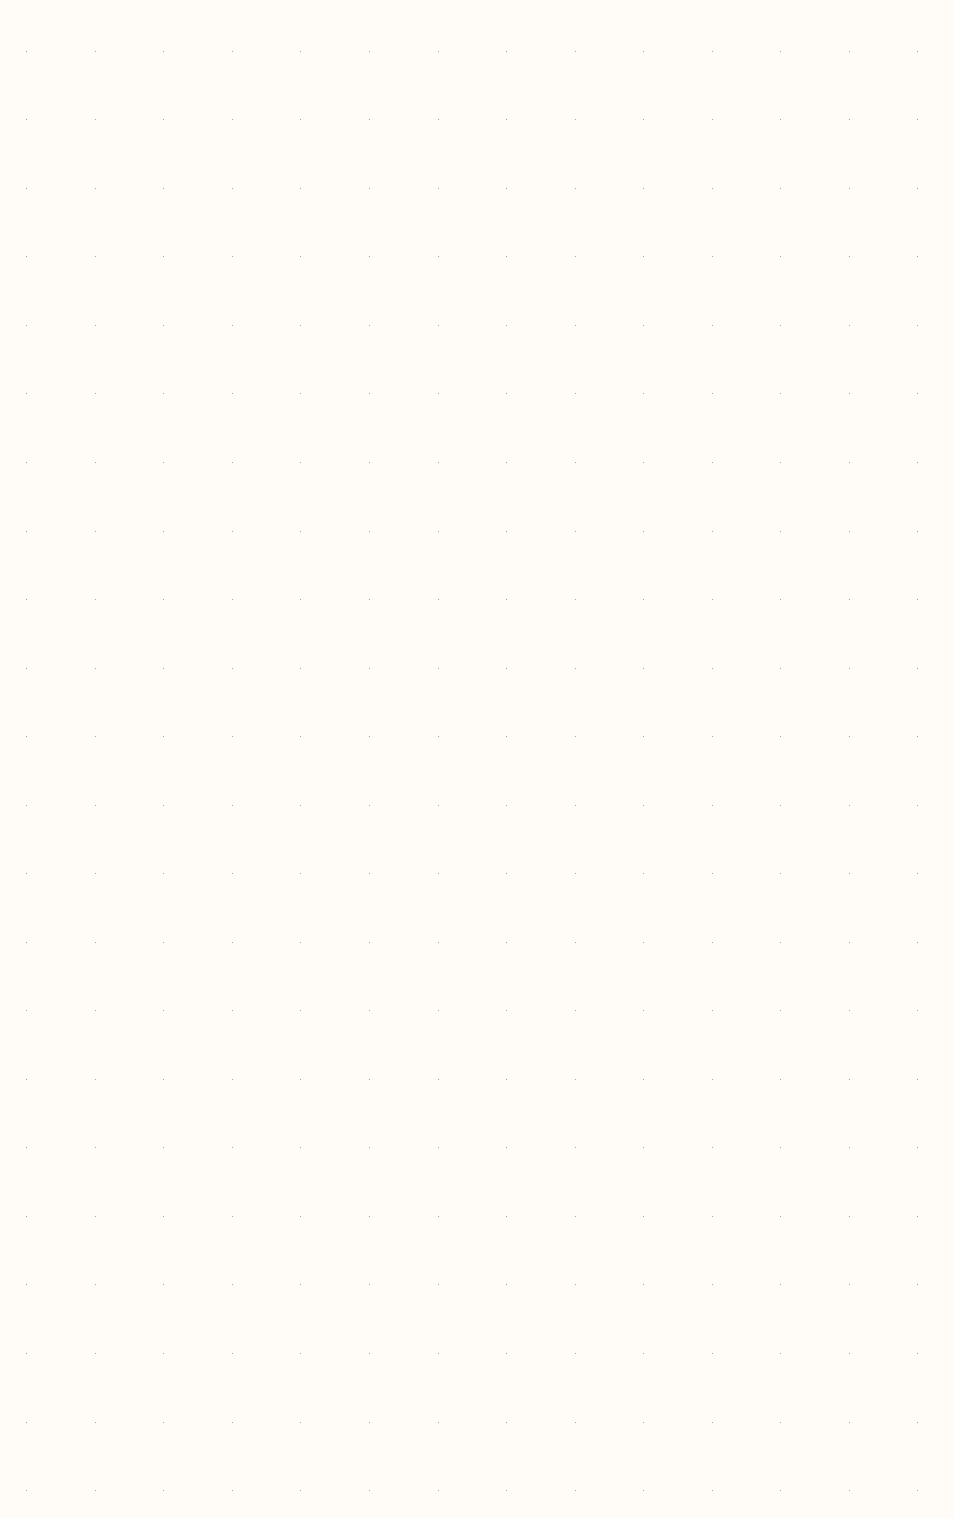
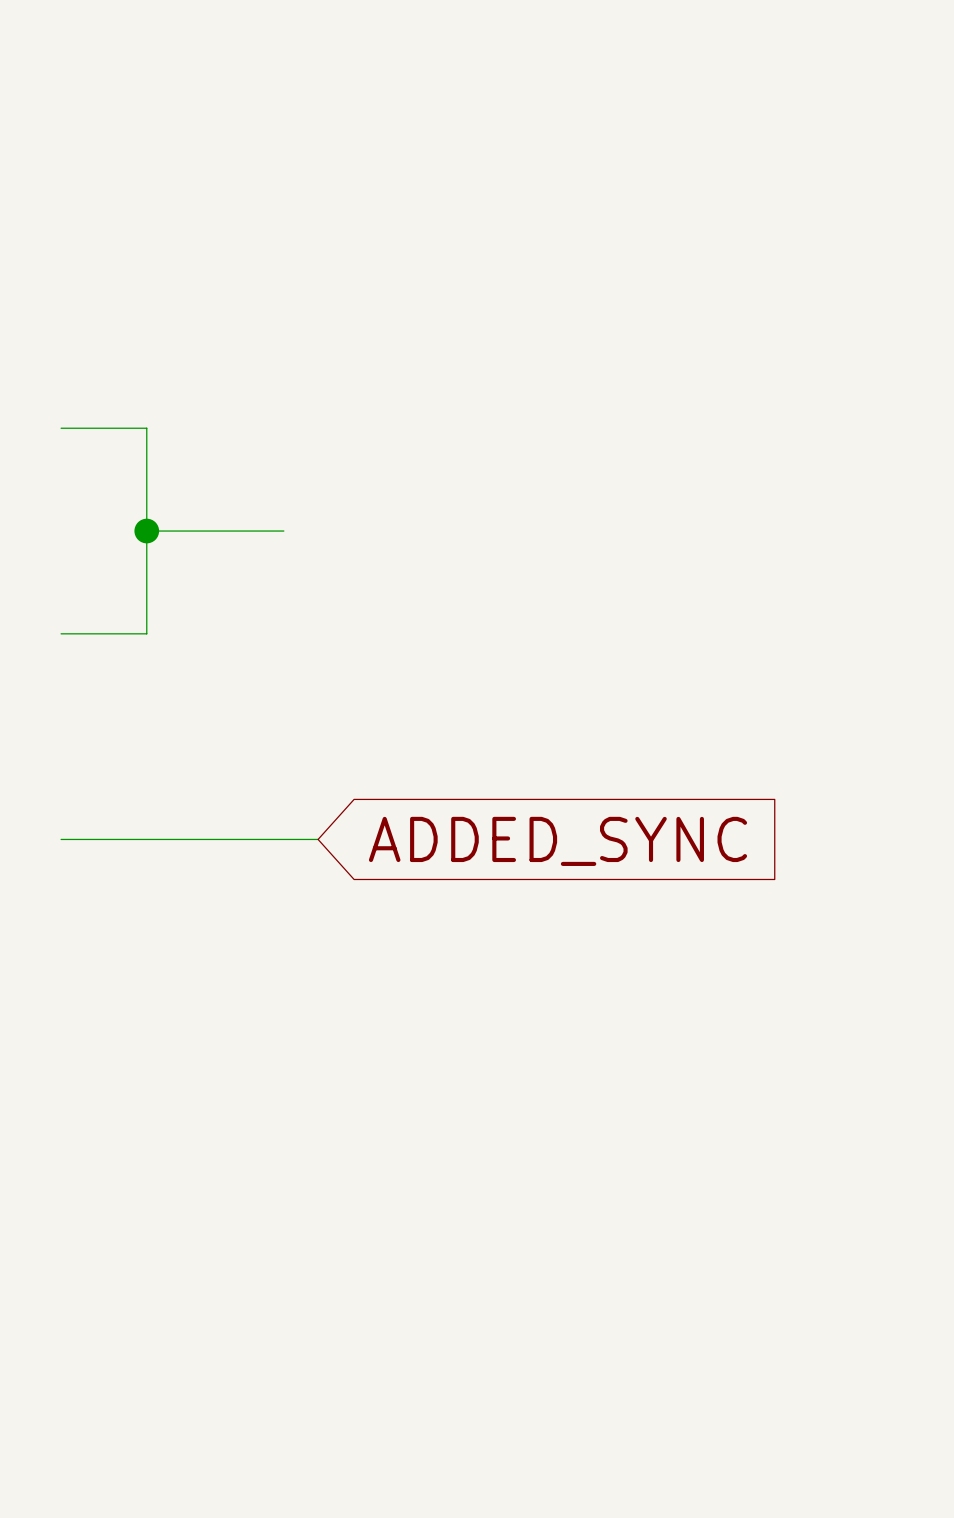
wire: none -> (61, 428) (146, 428) (146, 633) (61, 633)
wire: none -> (146, 531) (283, 531)
junction: none -> (146, 531)
wire: none -> (61, 839) (318, 839)
global label: none -> ADDED_SYNC (558, 841)

